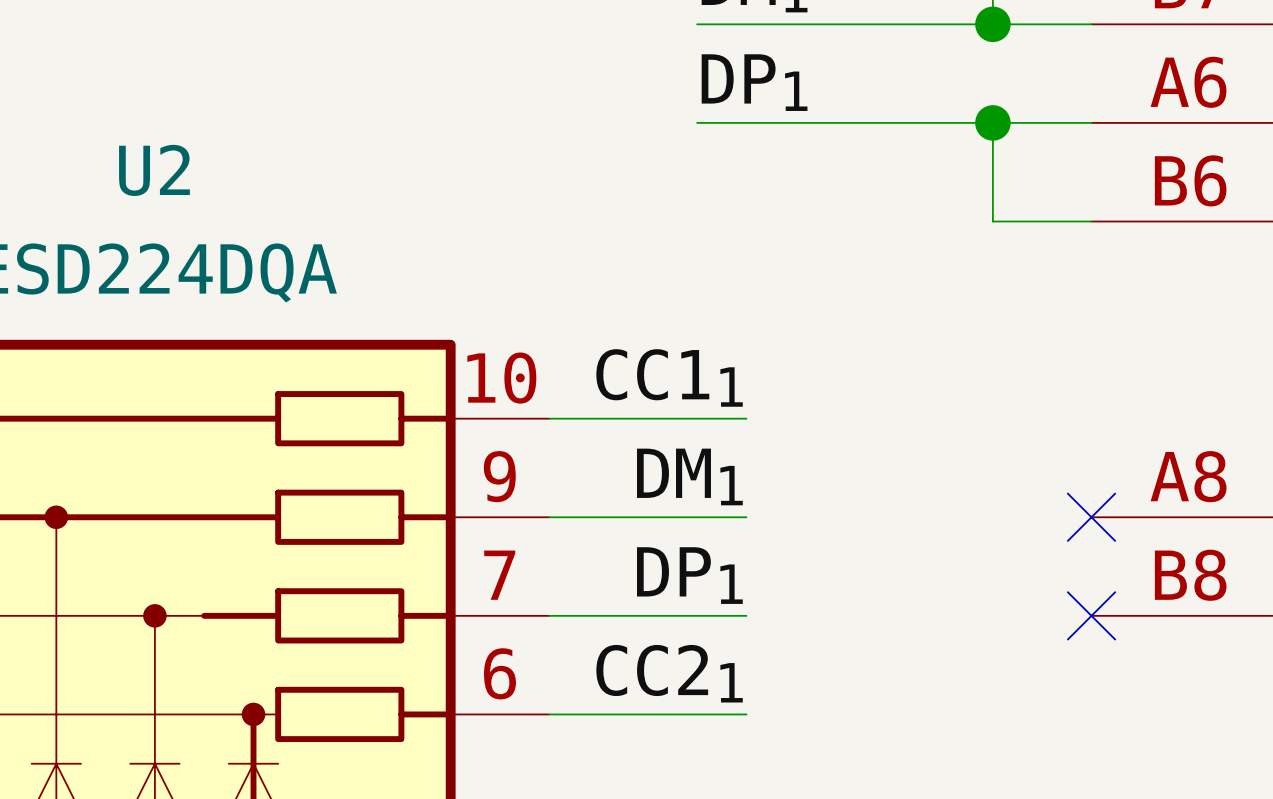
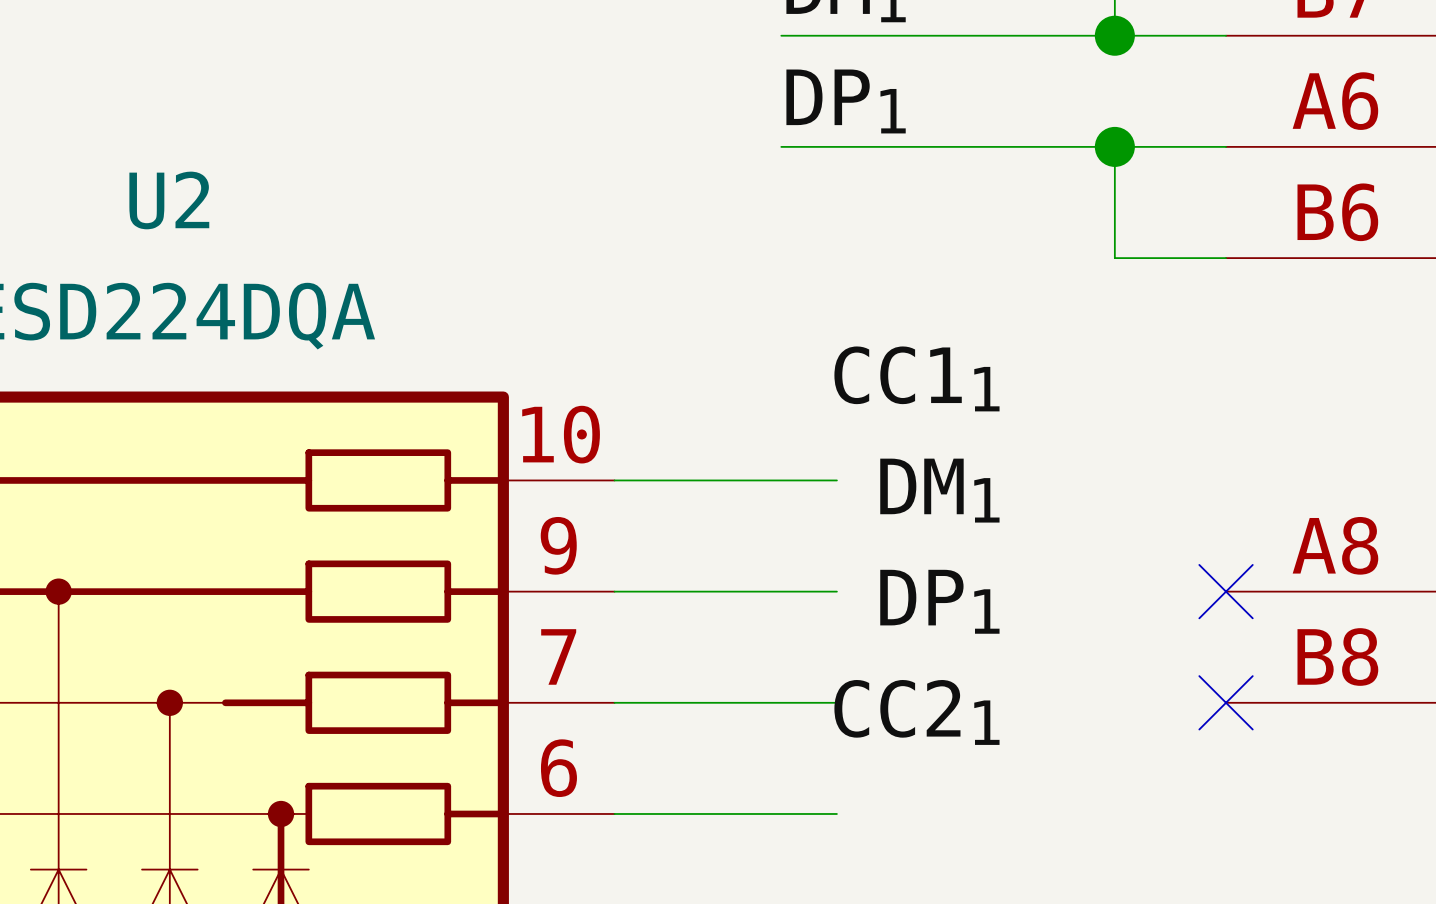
label position: CC11 (669, 377) -> CC11 (916, 378)
label position: DM1 (689, 476) -> DM1 (939, 490)
label position: DP1 (689, 575) -> DP1 (939, 601)
label position: CC21 (669, 673) -> CC21 (916, 712)

